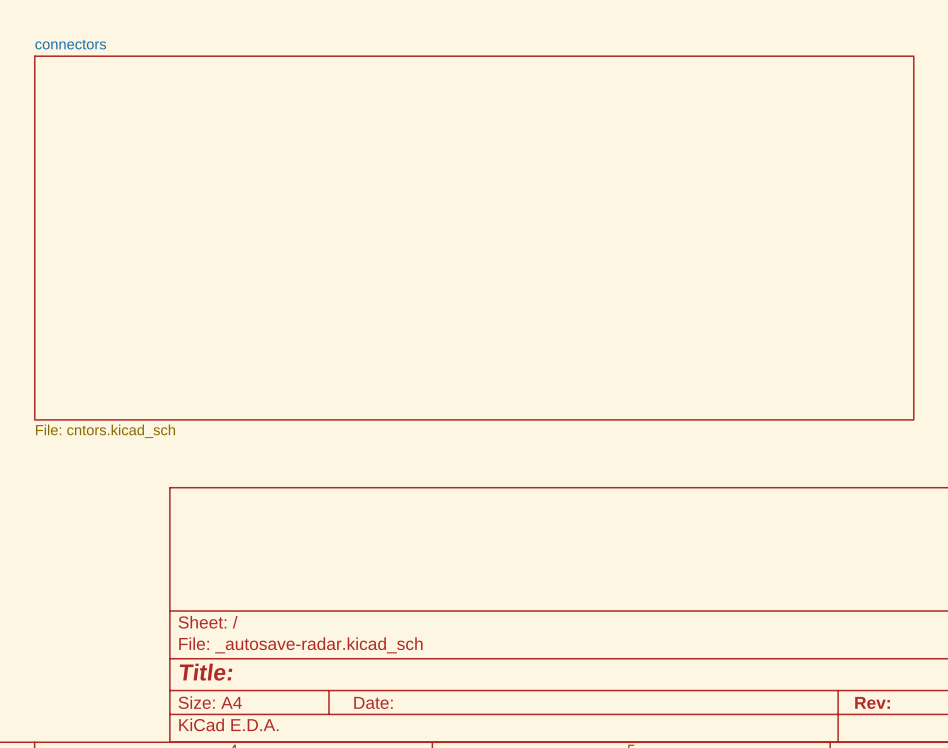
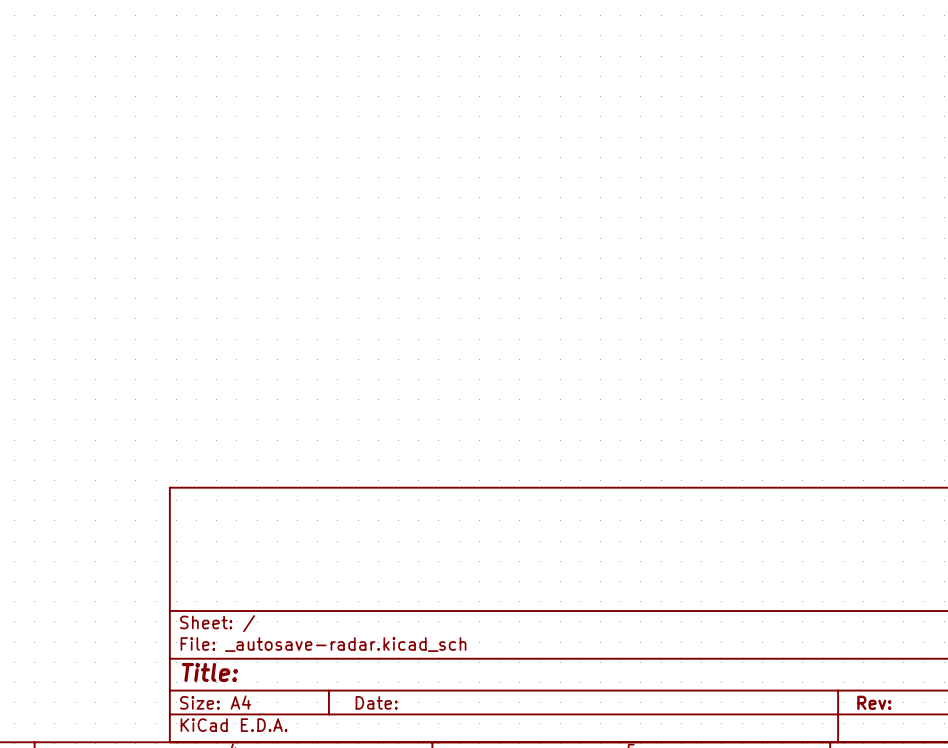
sheet connectors: File: cntors.kicad_sch (474, 238) -> none

